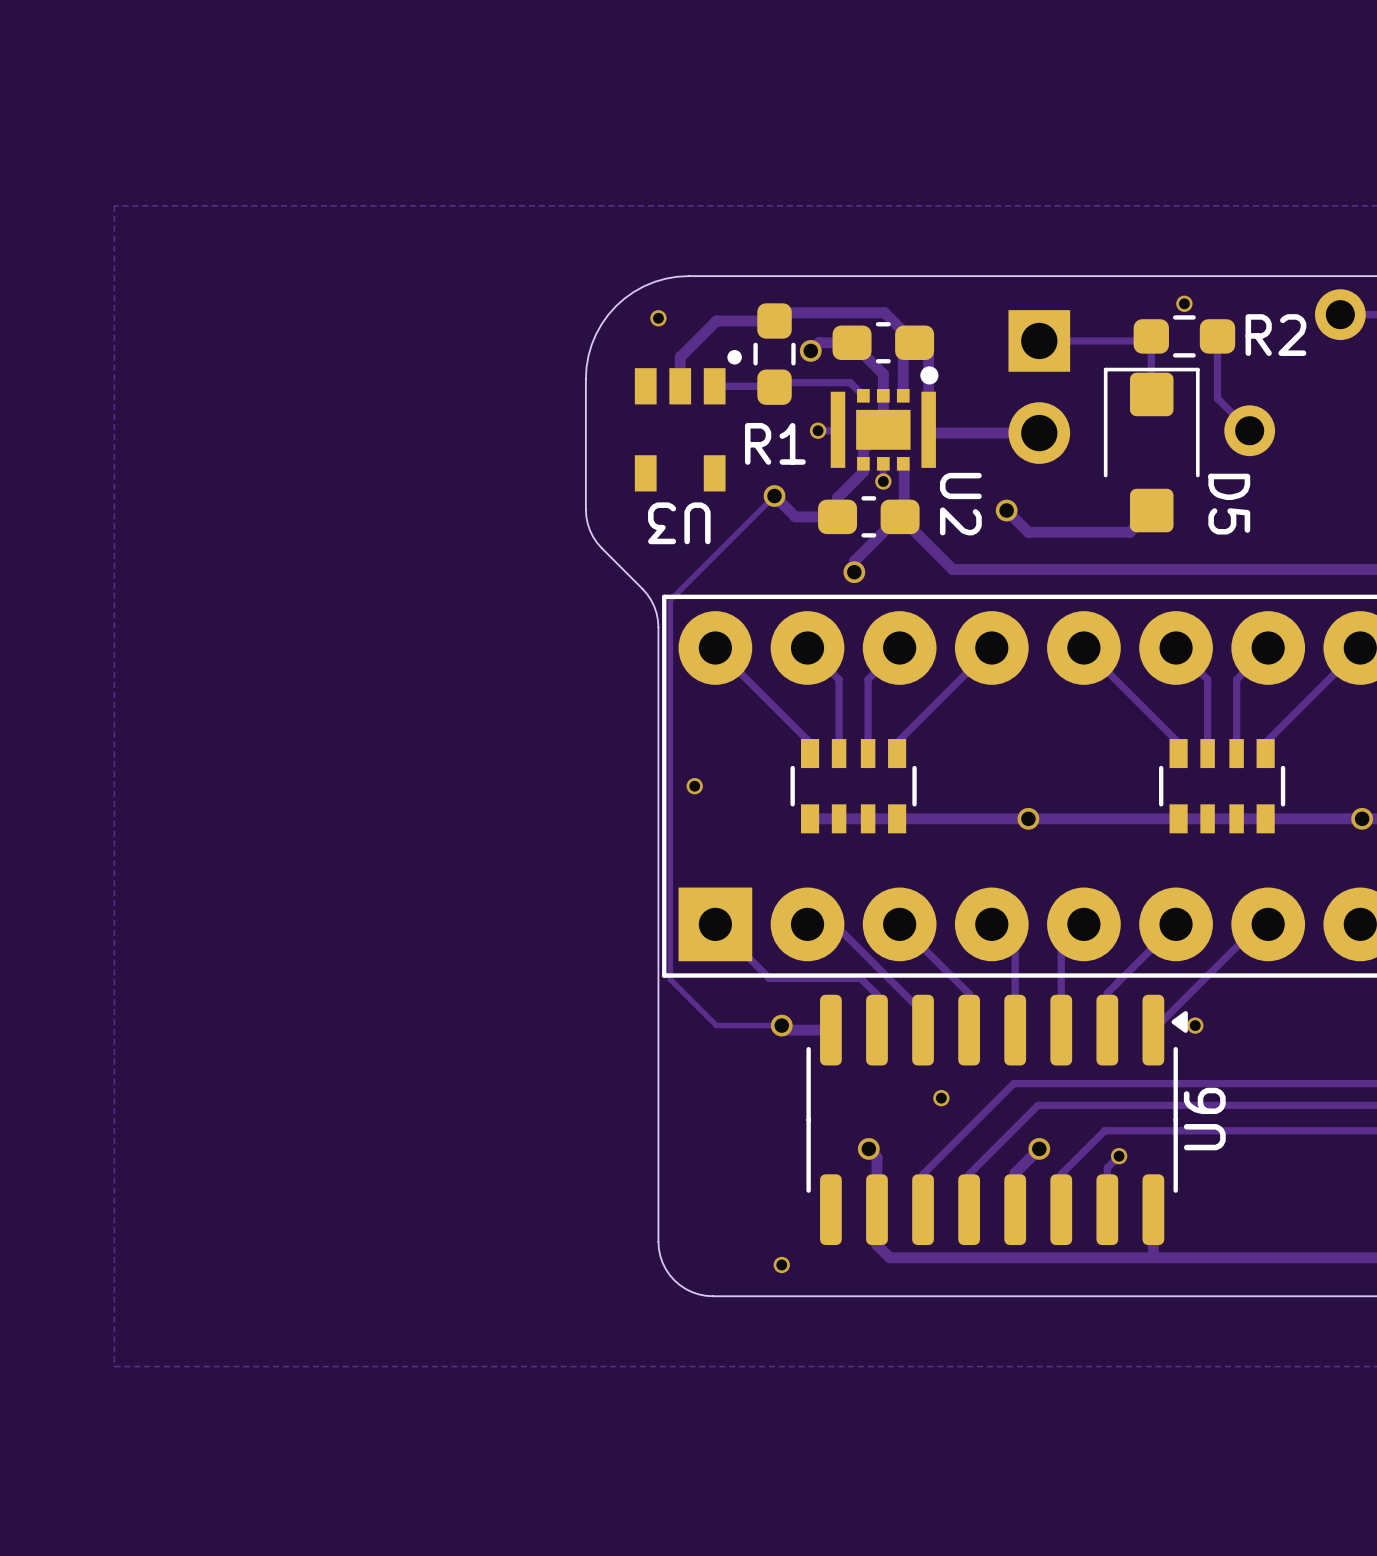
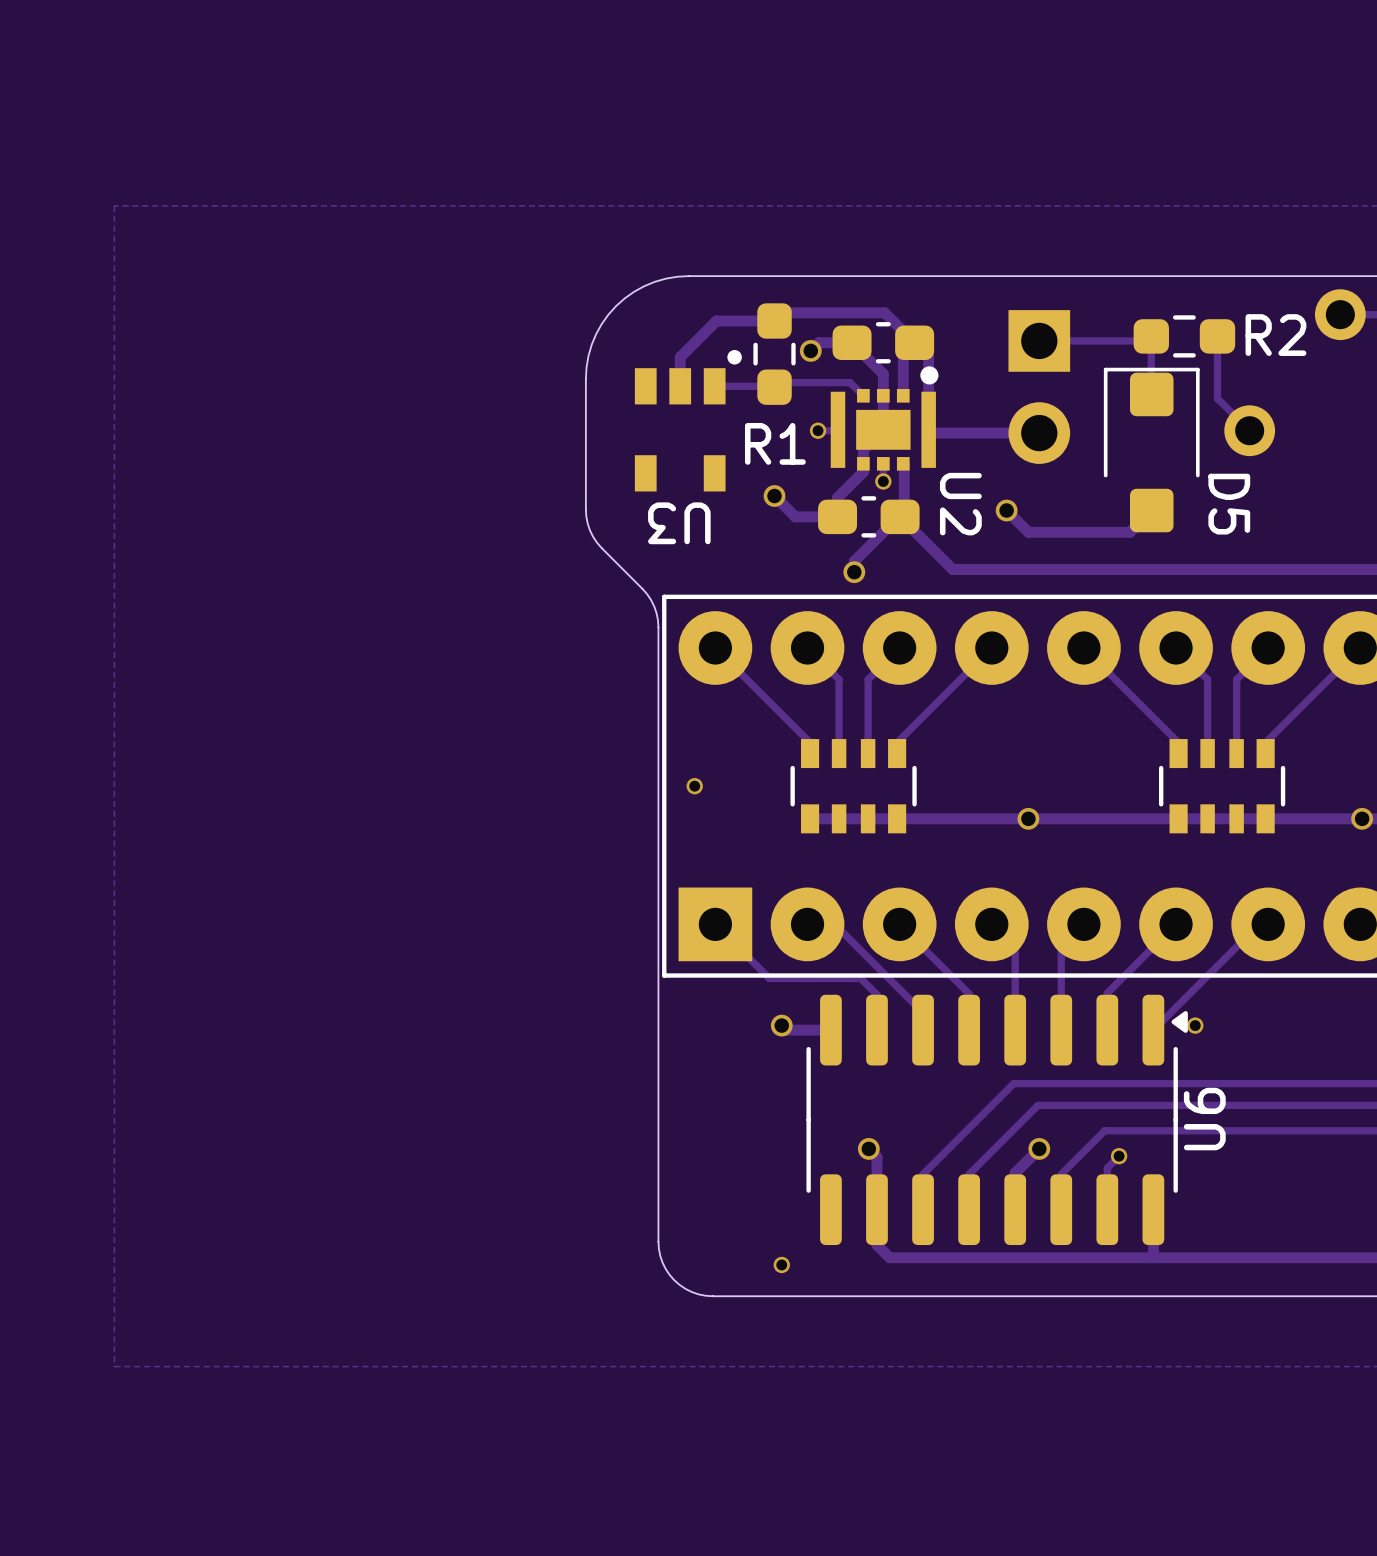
via: (1184, 303) -> none
via: (658, 318) -> none
track: (774, 496) (670, 600) (670, 979) (716, 1025) (781, 1025) -> none
via: (941, 1098) -> none

